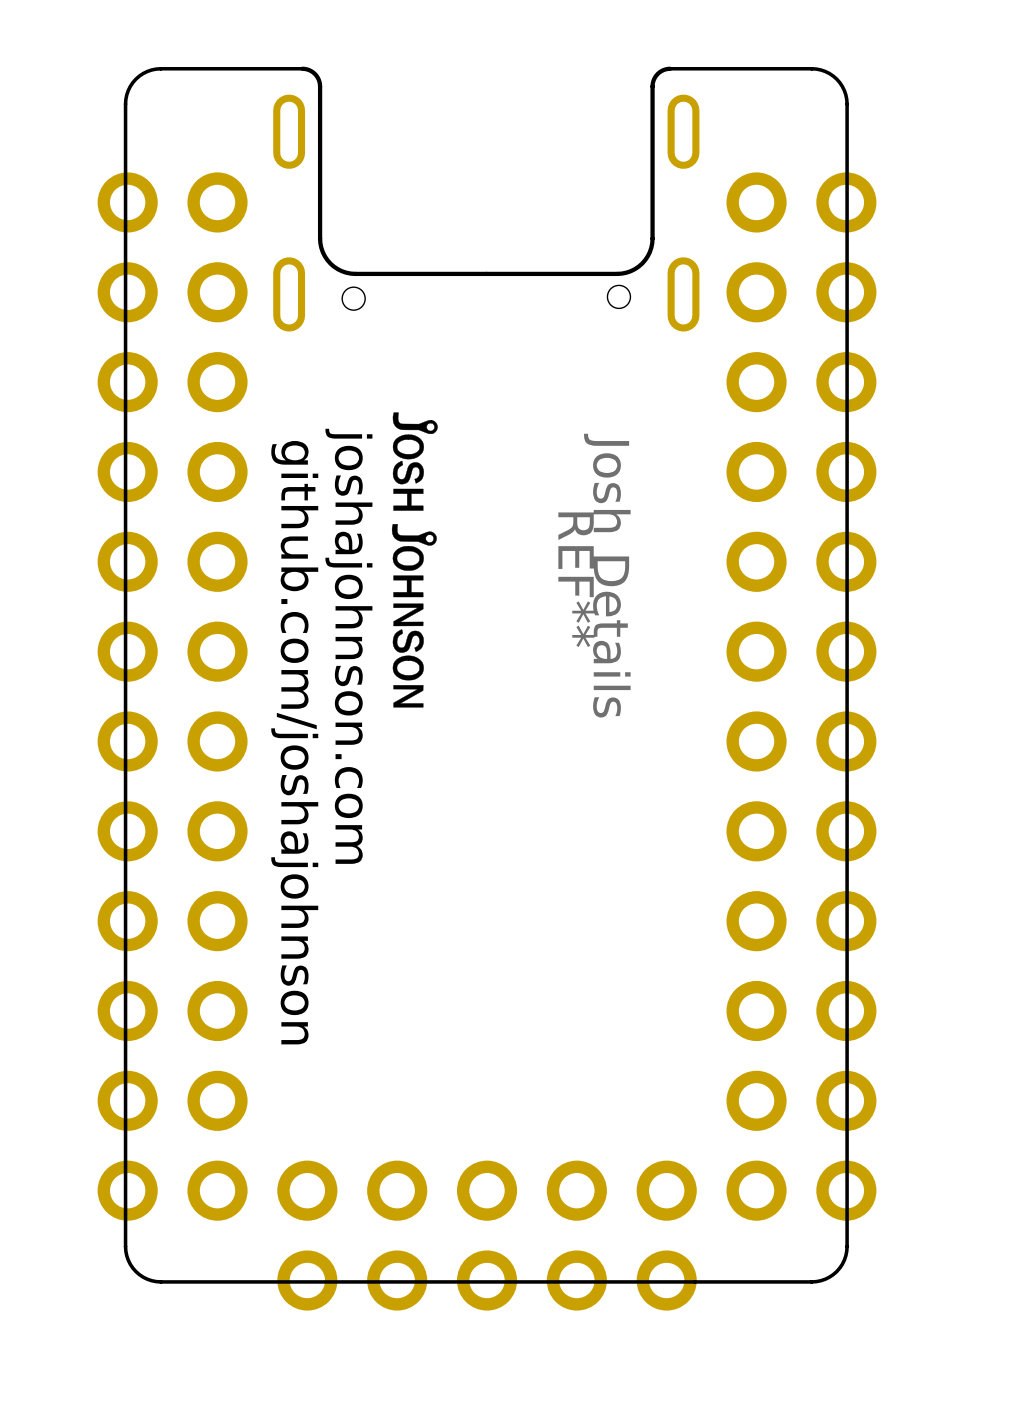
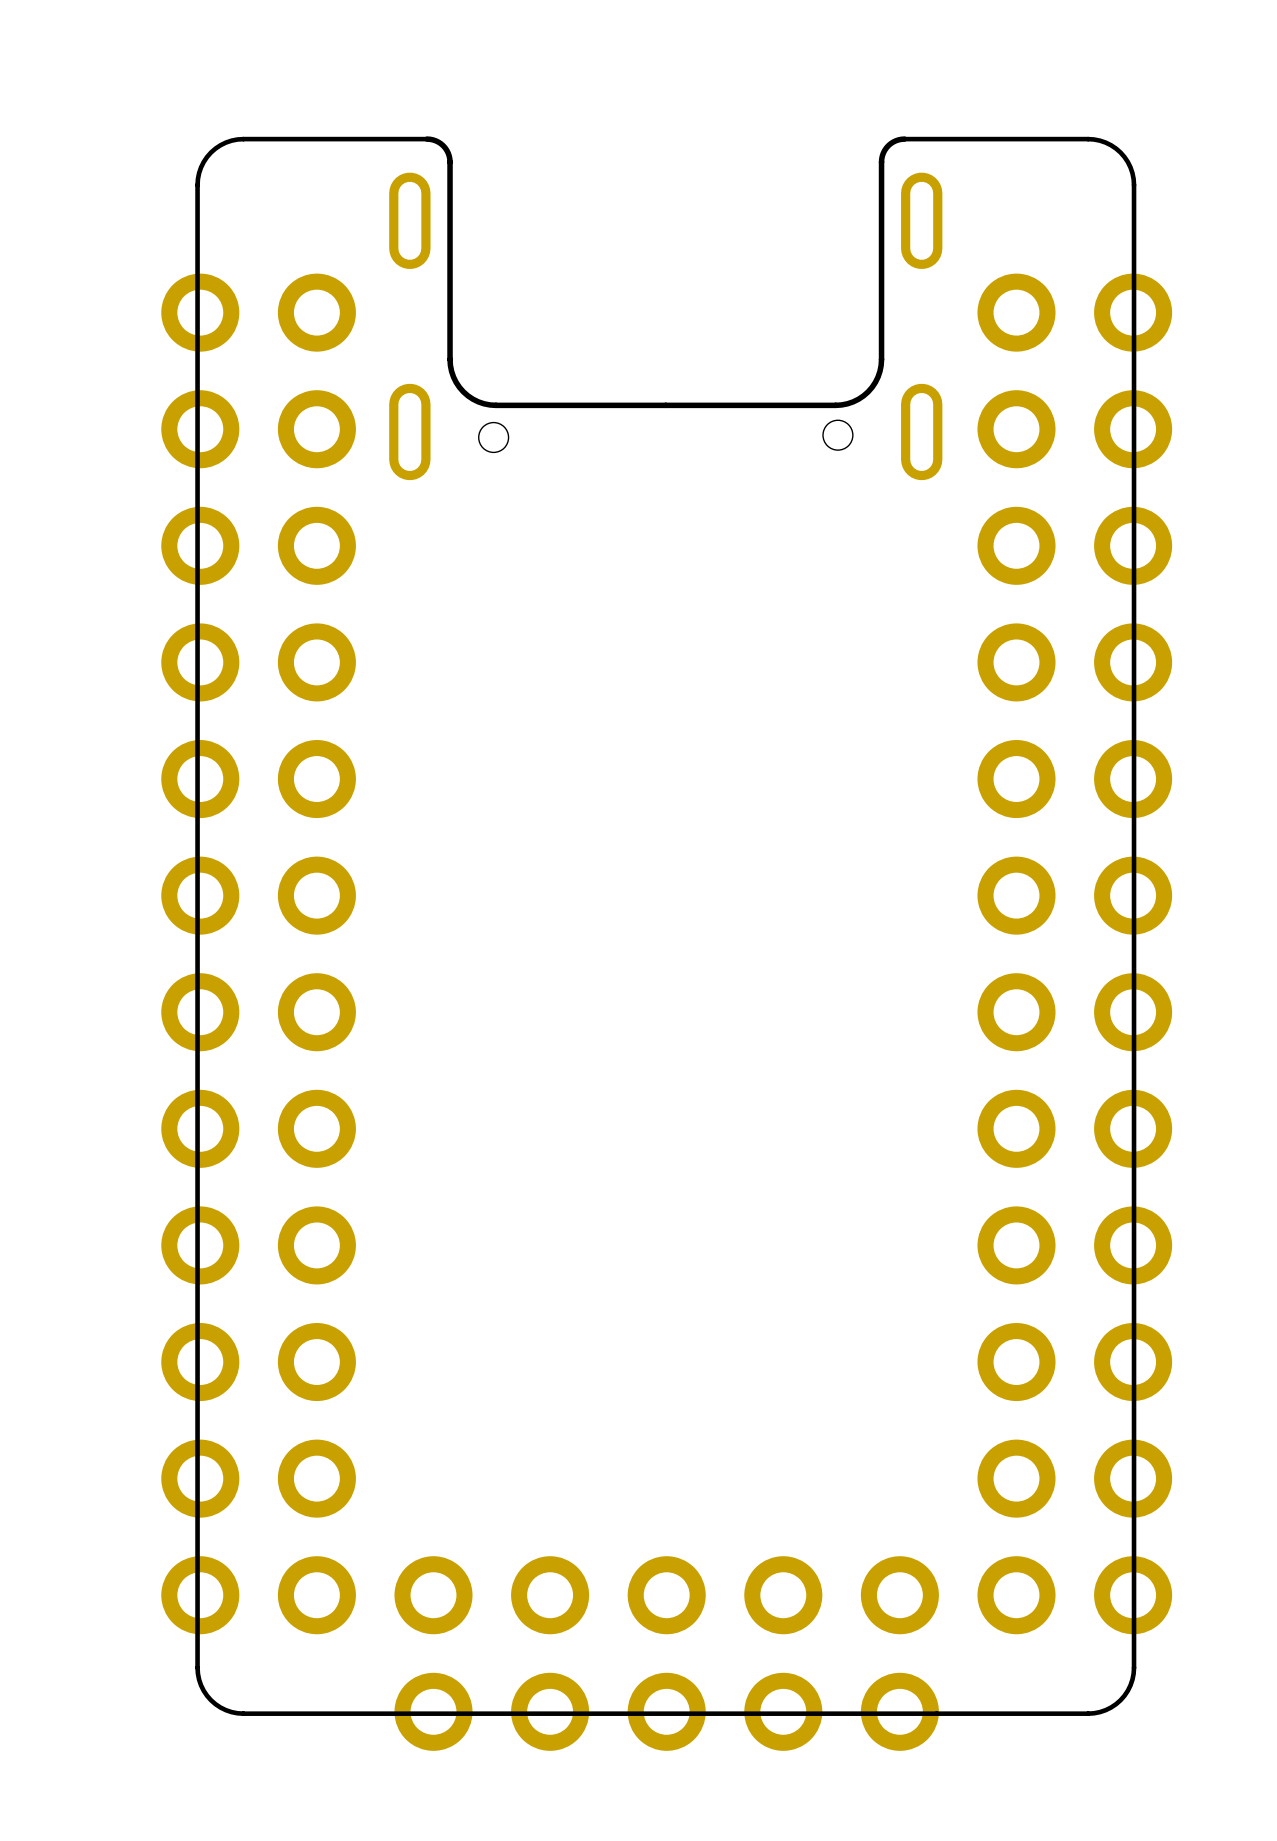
drawing: [391, 412, 438, 708] -> none
REF**: Josh Details (450, 736) -> none

